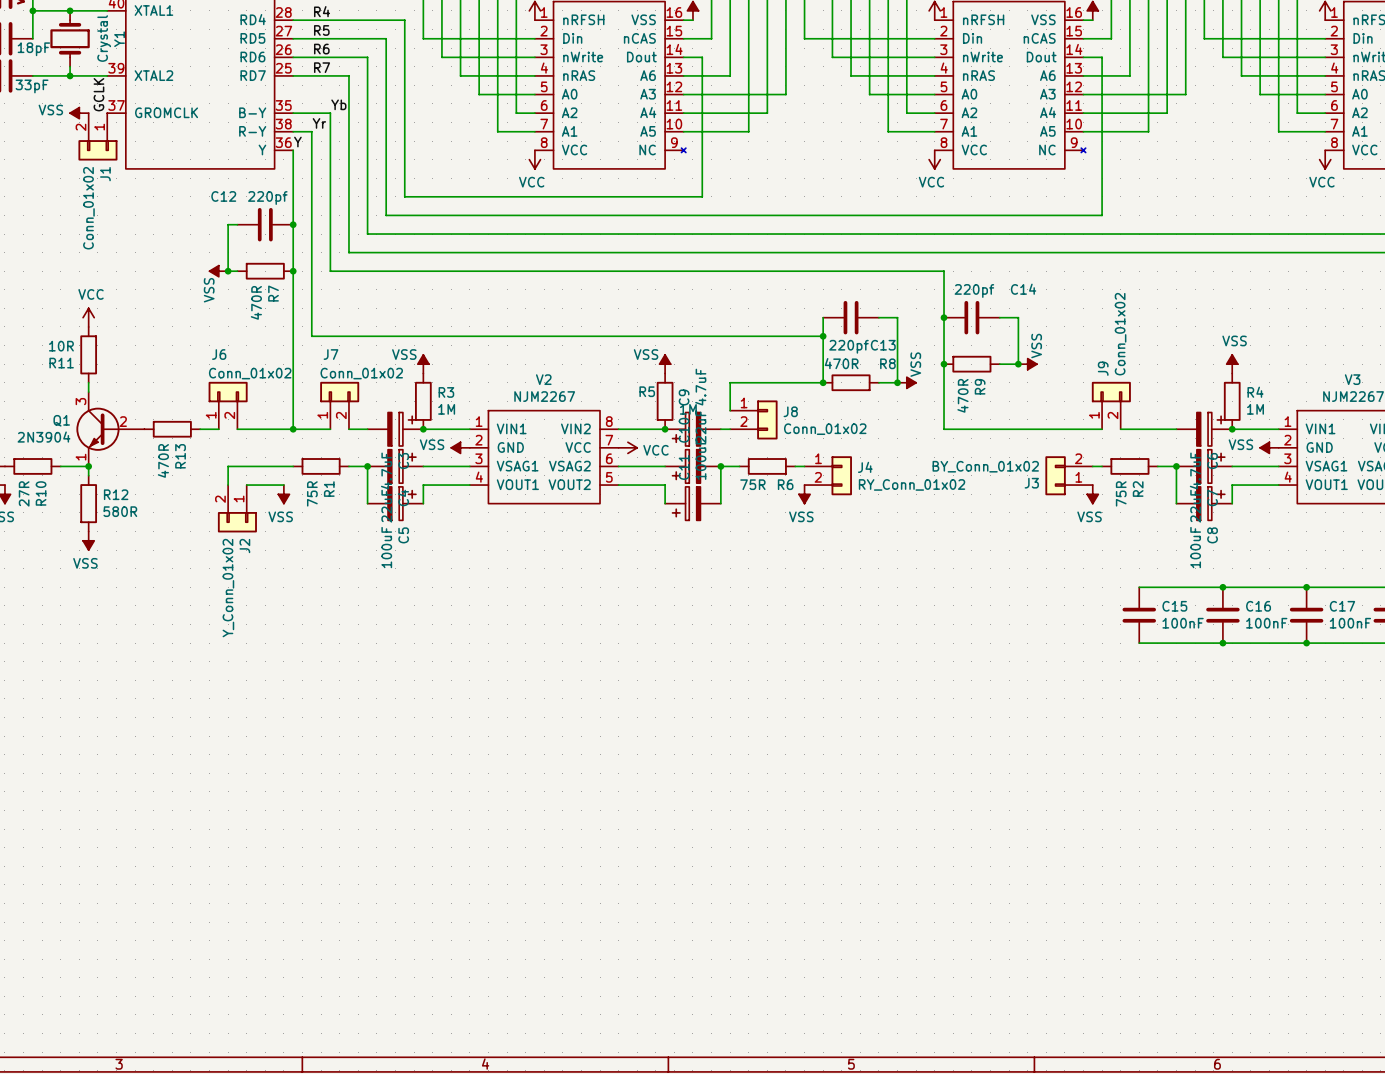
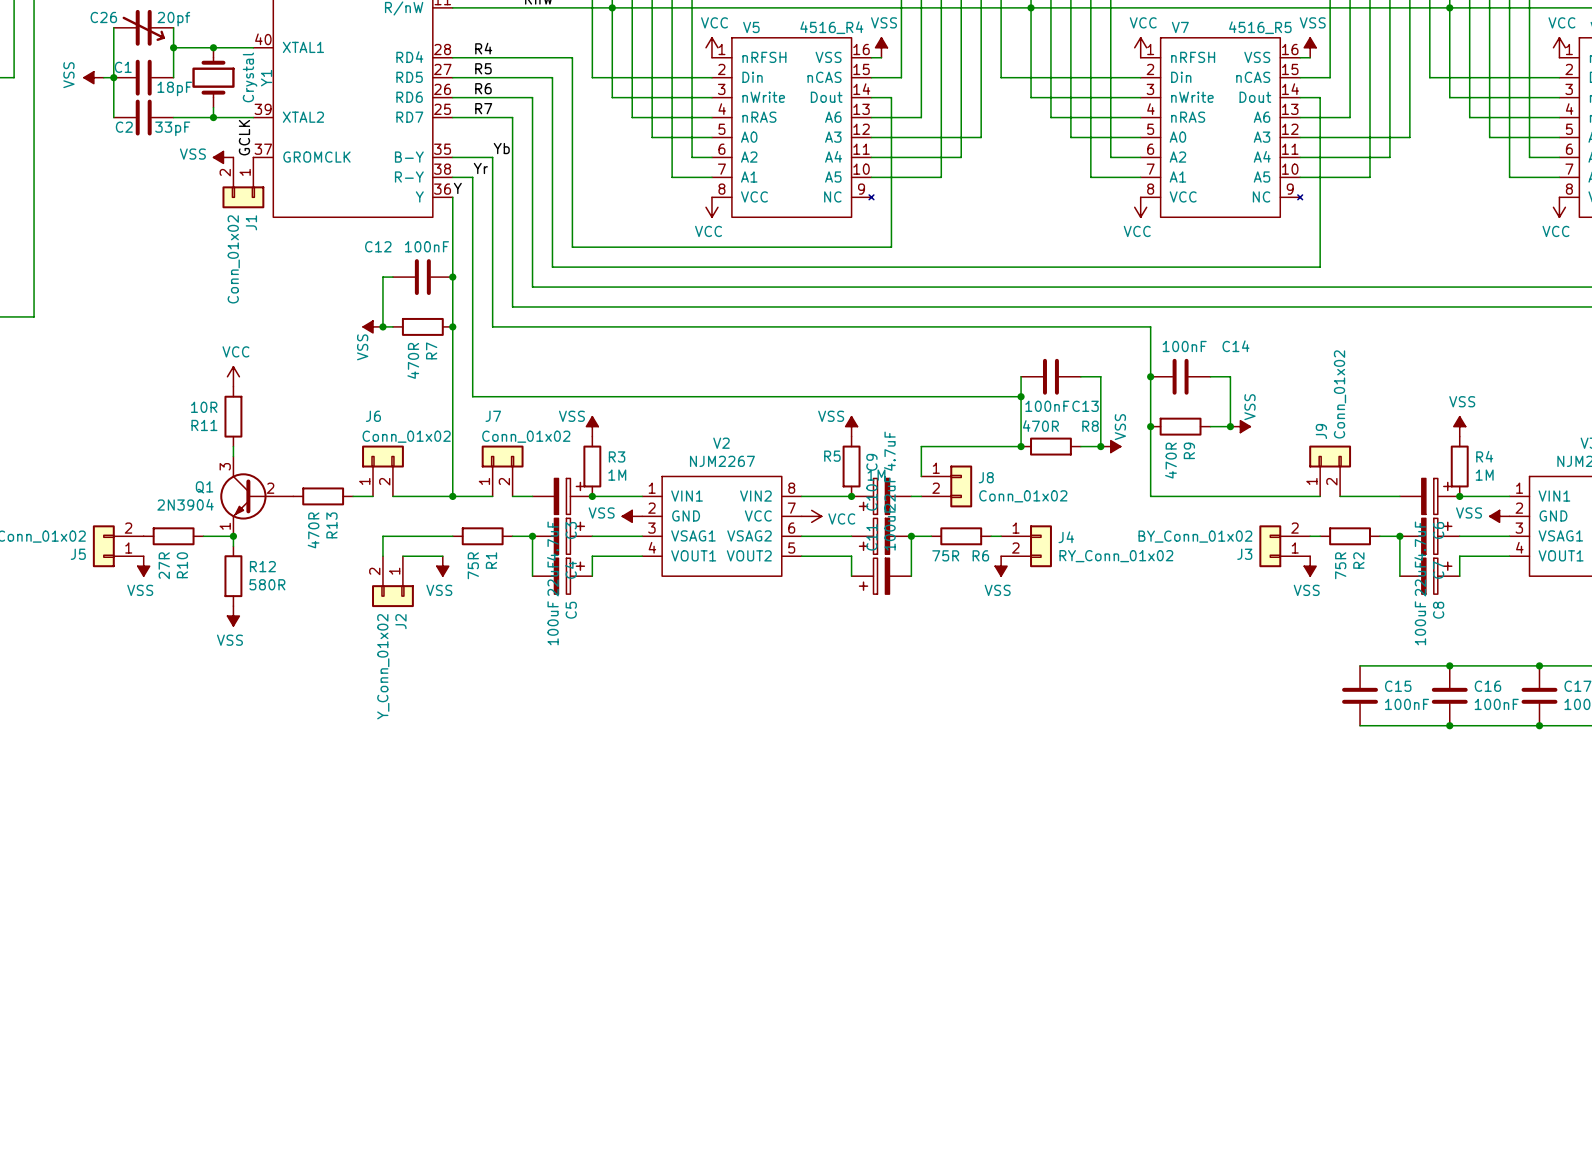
C12 value: 220pf (267, 198) -> 100nF (426, 246)
C14 value: 220pf (974, 290) -> 100nF (1184, 346)
C13 value: 220pf (848, 346) -> 100nF (1047, 406)

